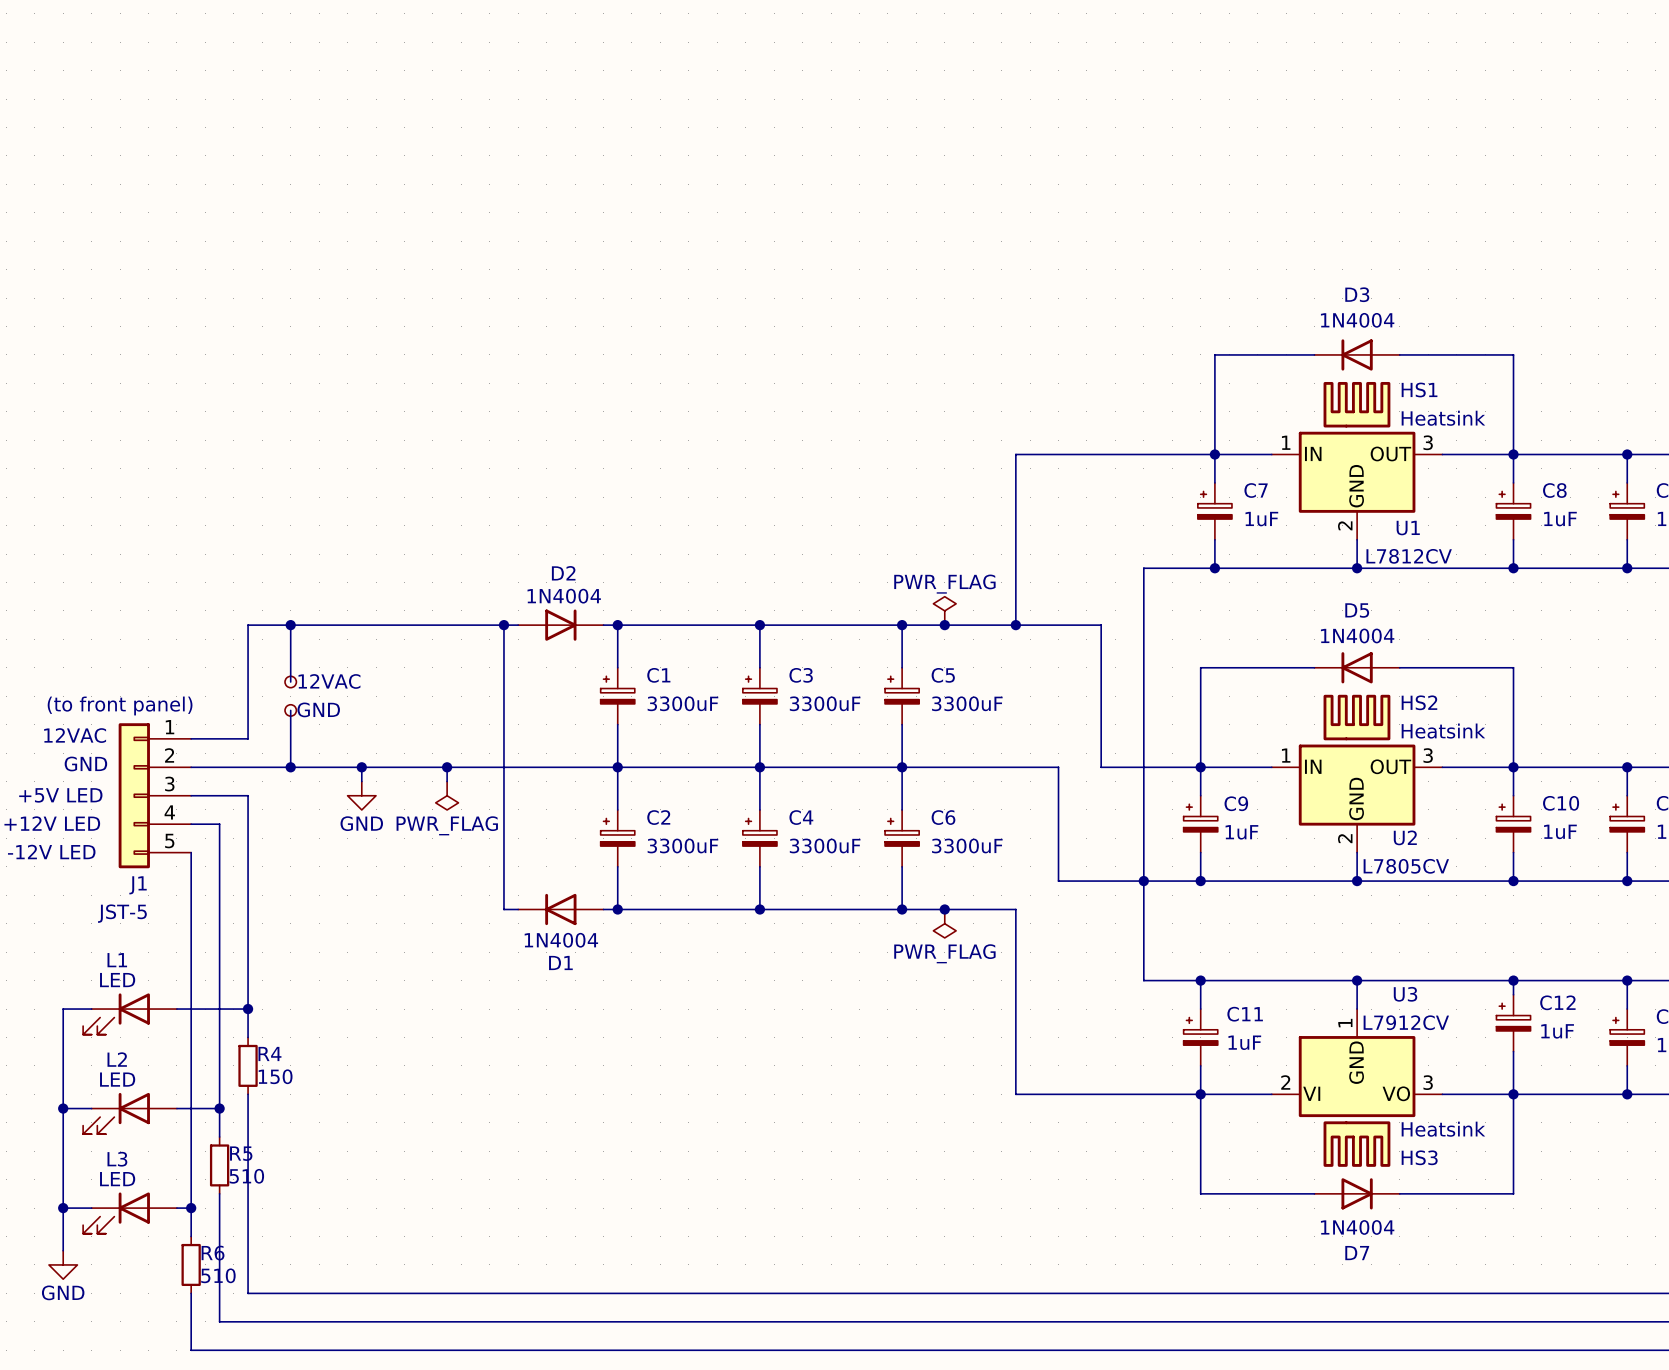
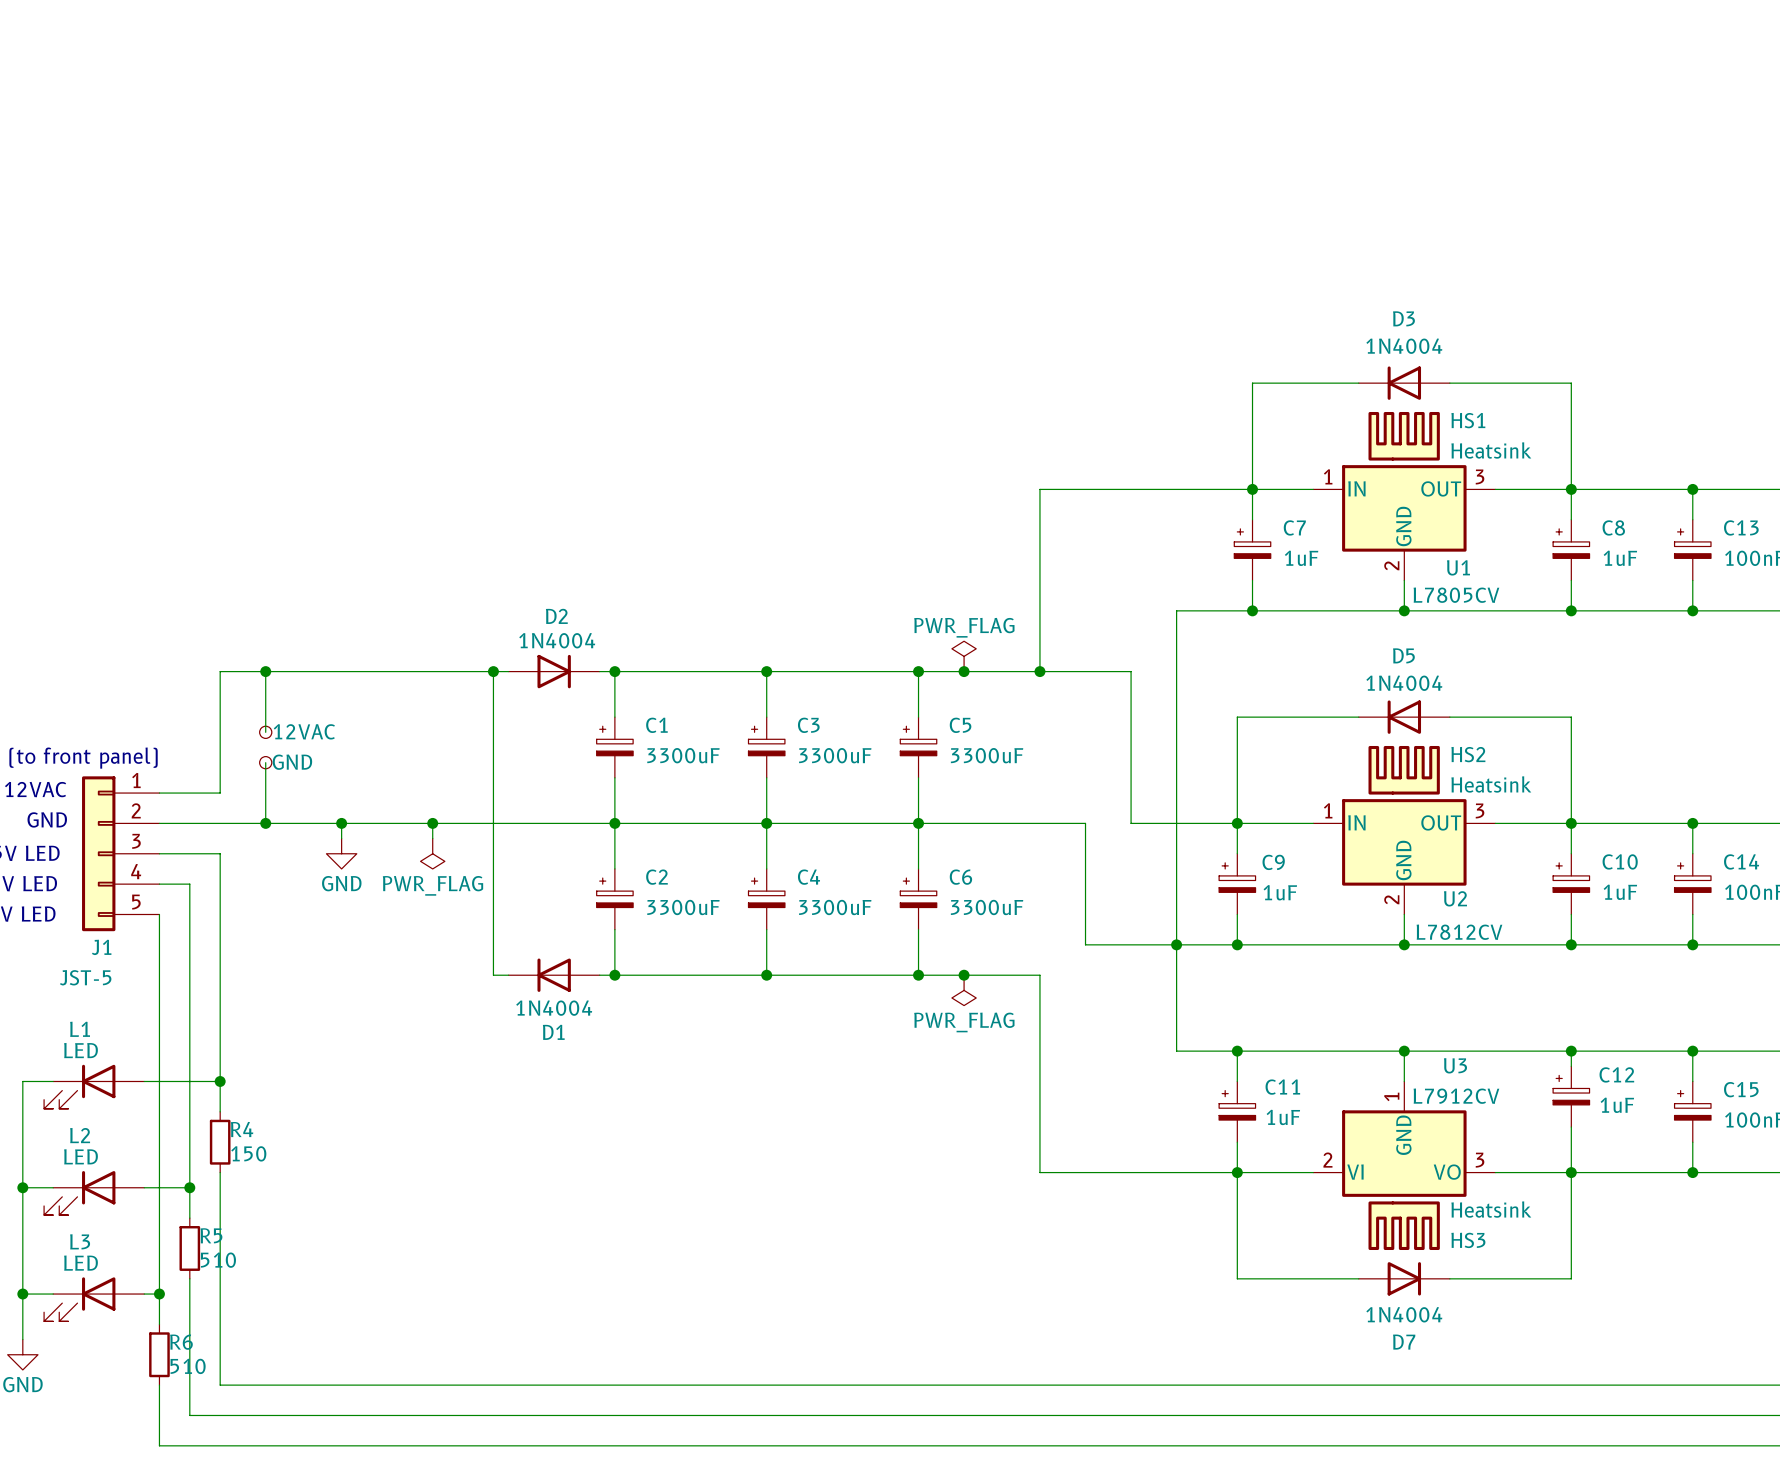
U1 value: L7812CV (1409, 556) -> L7805CV (1456, 595)
U2 value: L7805CV (1406, 866) -> L7812CV (1459, 932)

